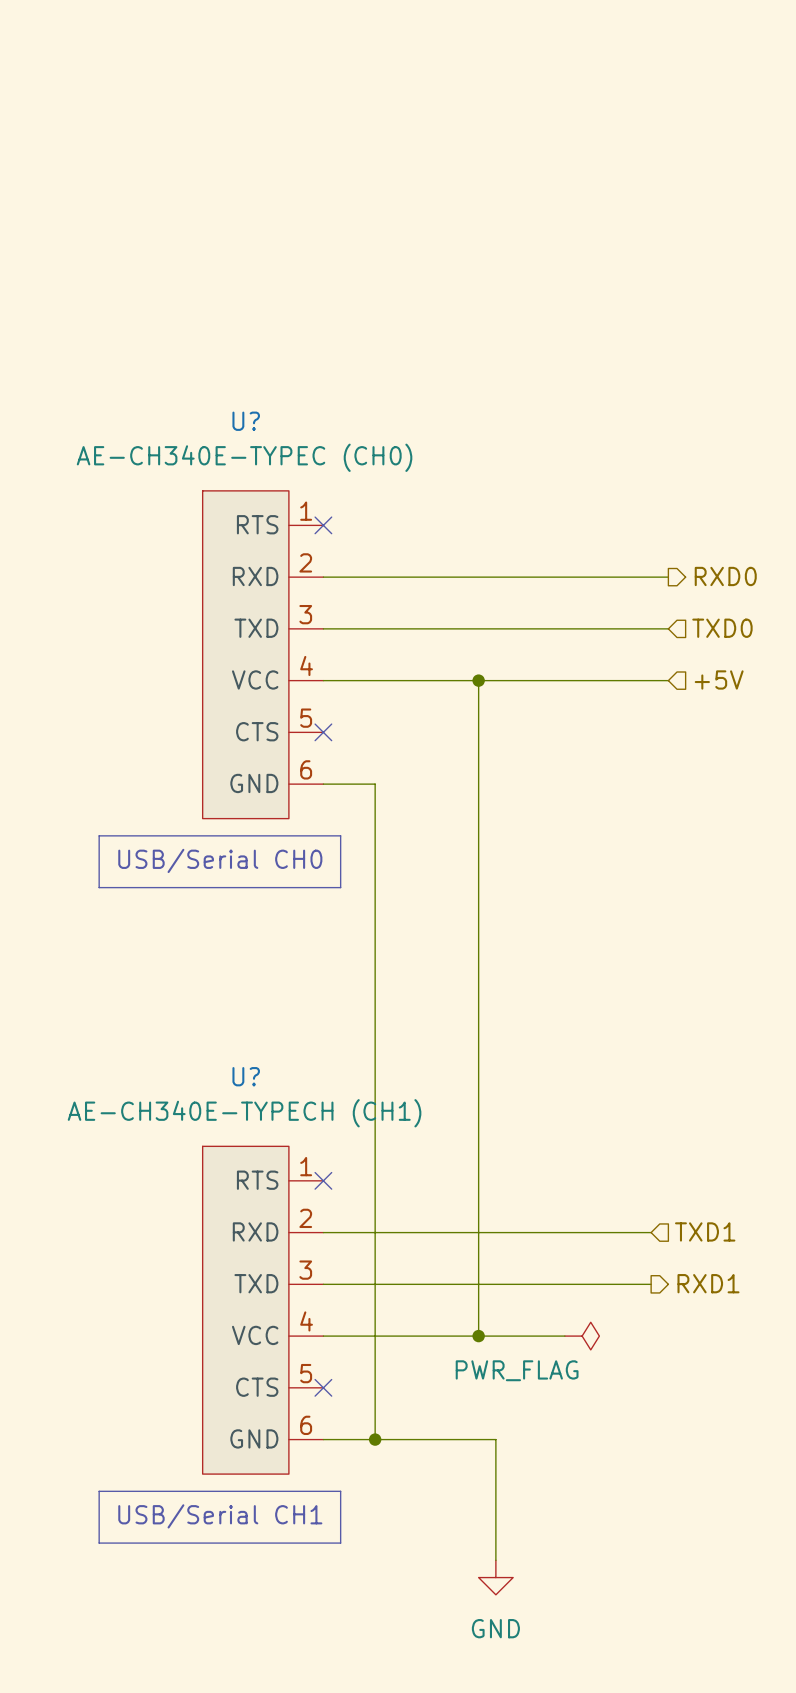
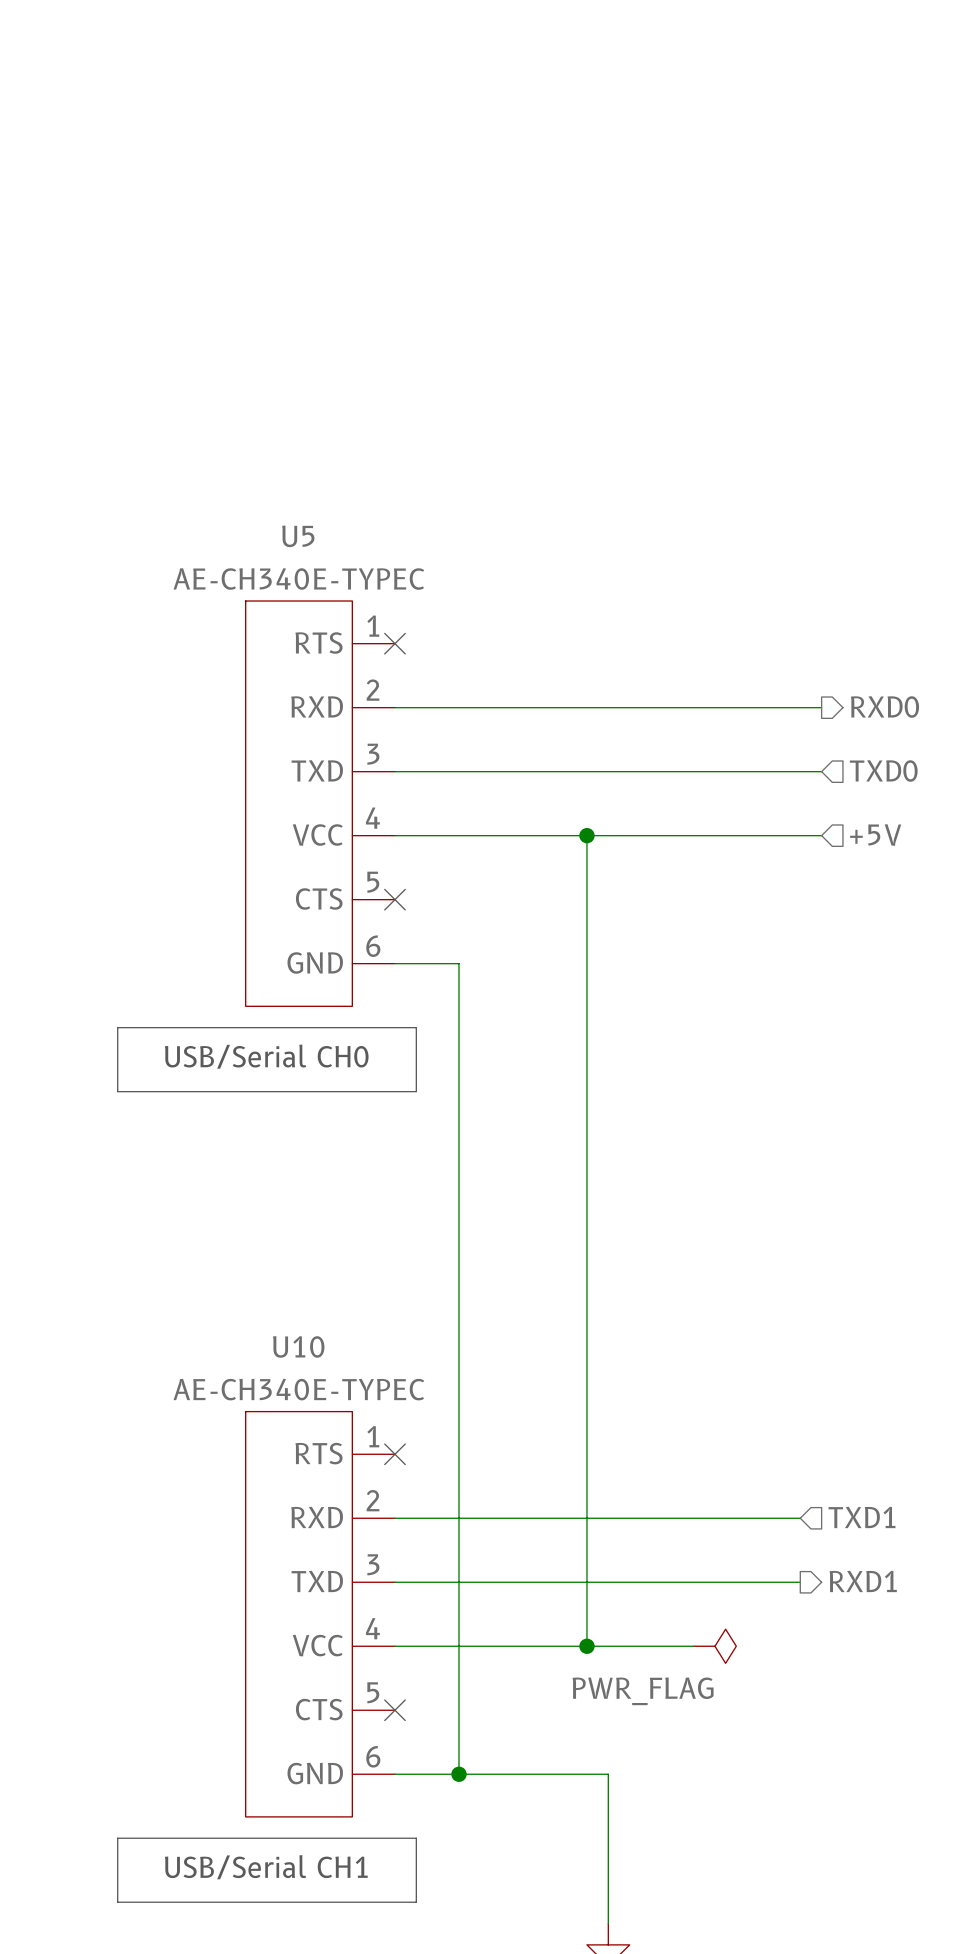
U? name: U? (246, 421) -> U5 (298, 536)
U? value: AE-CH340E-TYPEC (CH0) (244, 457) -> AE-CH340E-TYPEC (298, 579)
U? name: U? (246, 1076) -> U10 (298, 1346)
U? value: AE-CH340E-TYPECH (CH1) (244, 1113) -> AE-CH340E-TYPEC (298, 1389)

